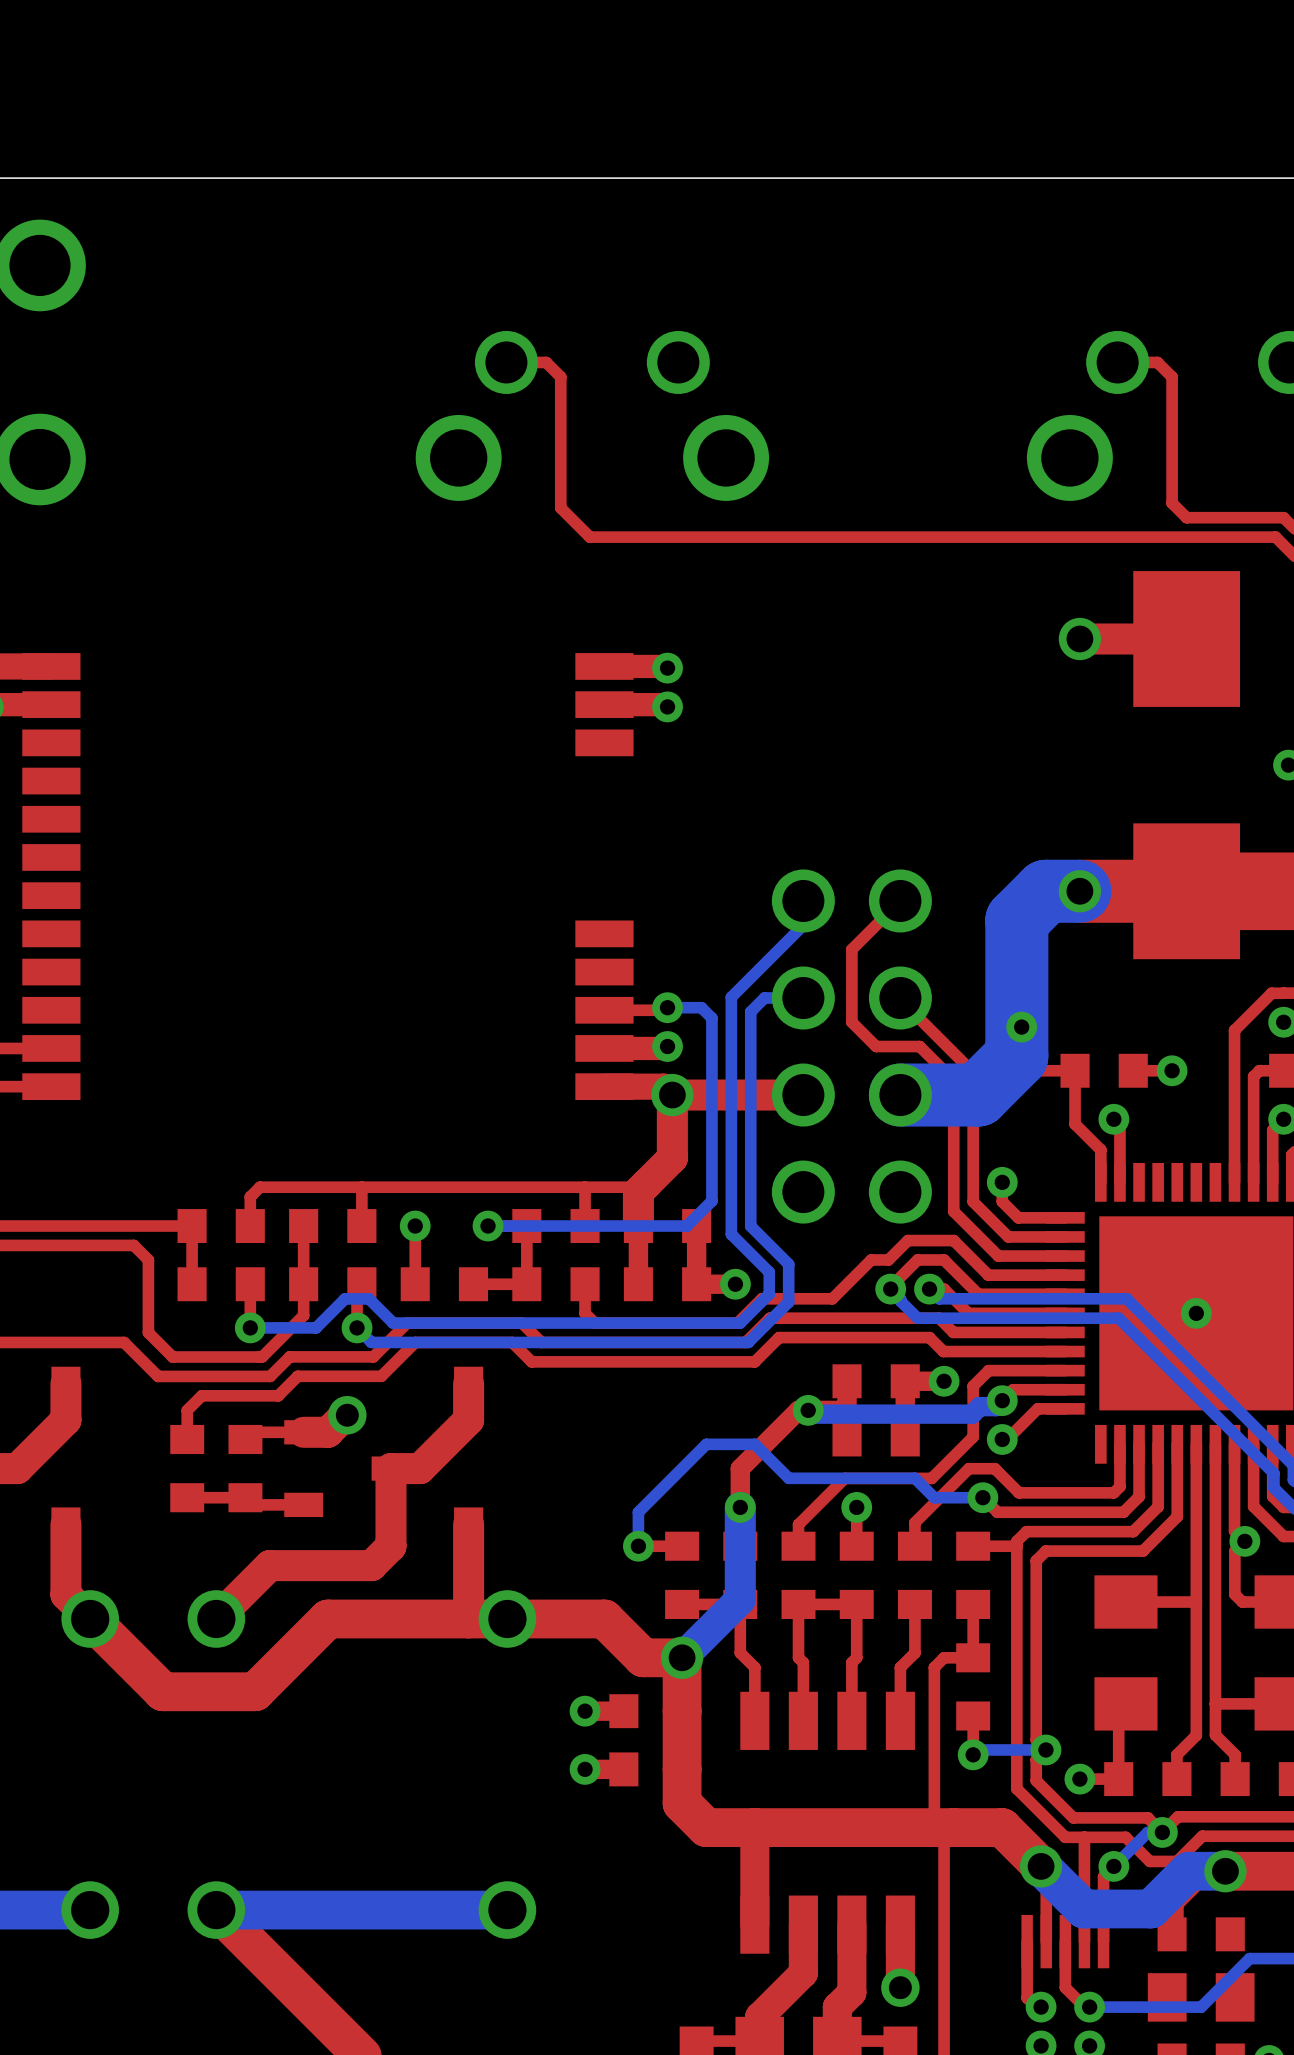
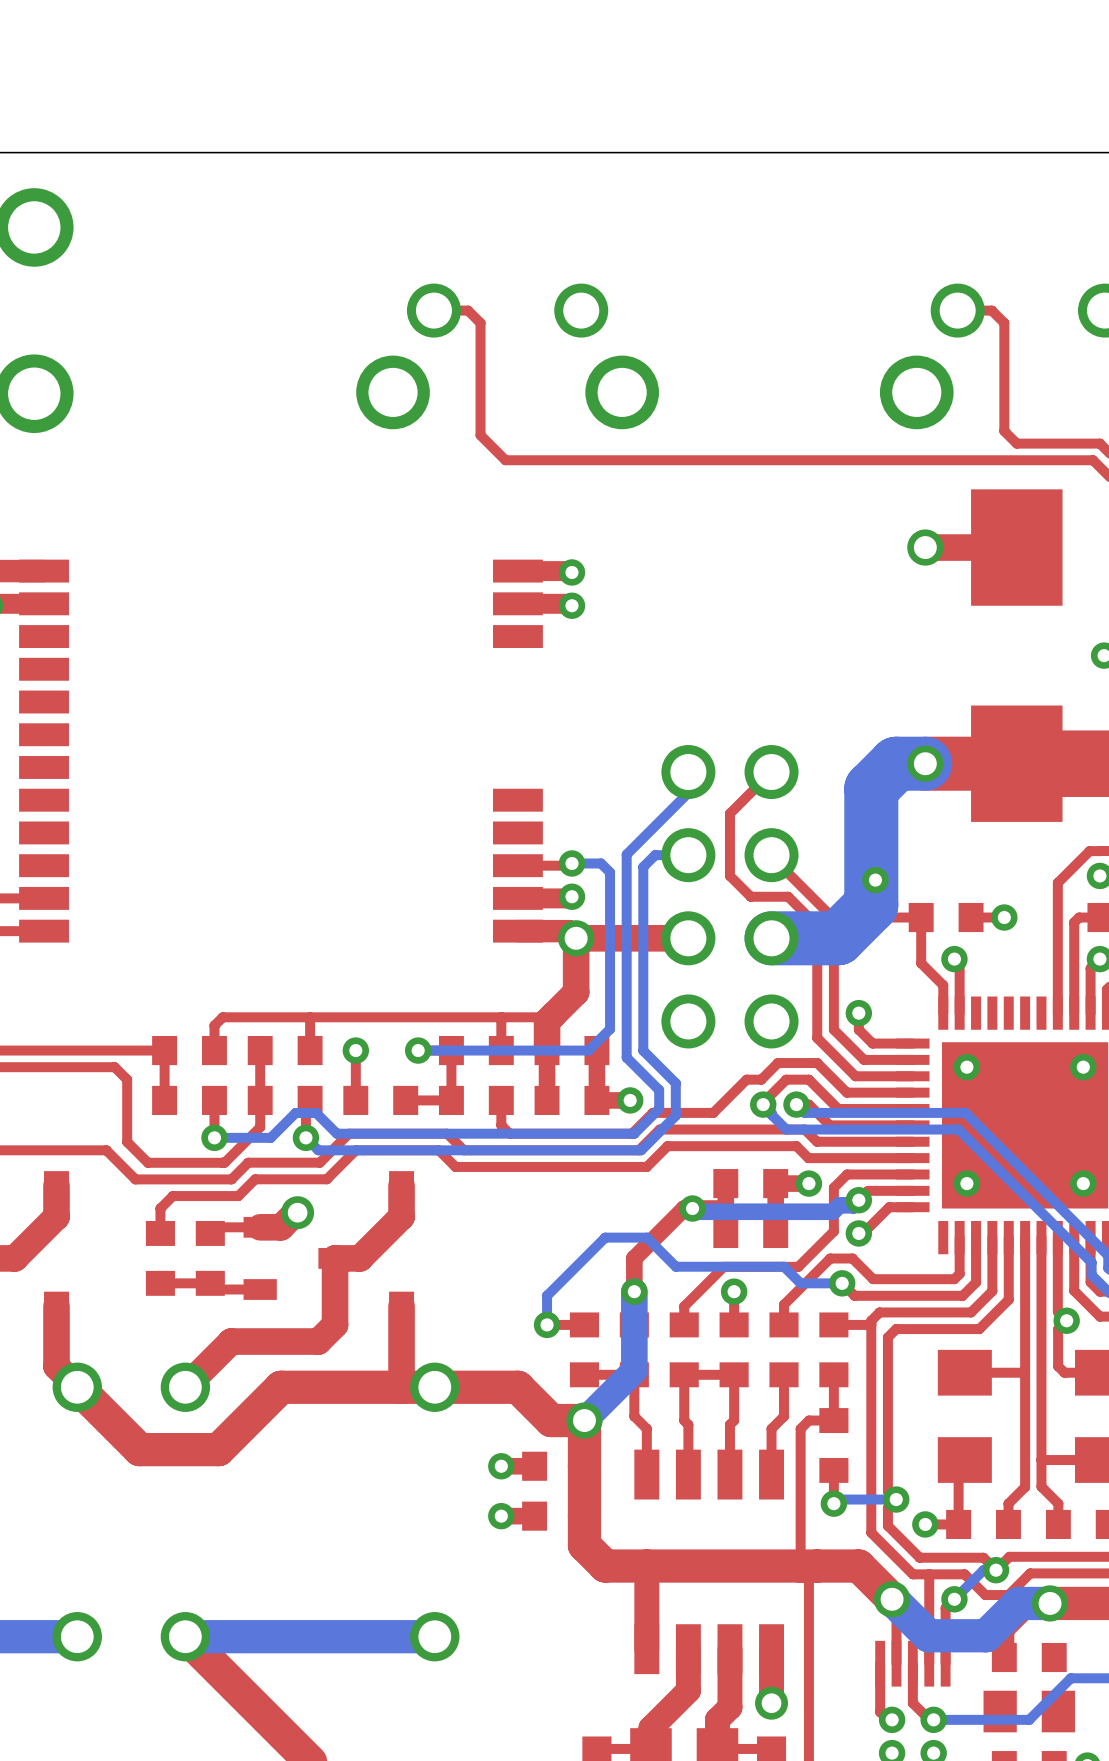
via: none -> (966, 1067)
via: none -> (1083, 1067)
via: (1196, 1313) -> none
via: none -> (966, 1183)
via: none -> (1083, 1183)

